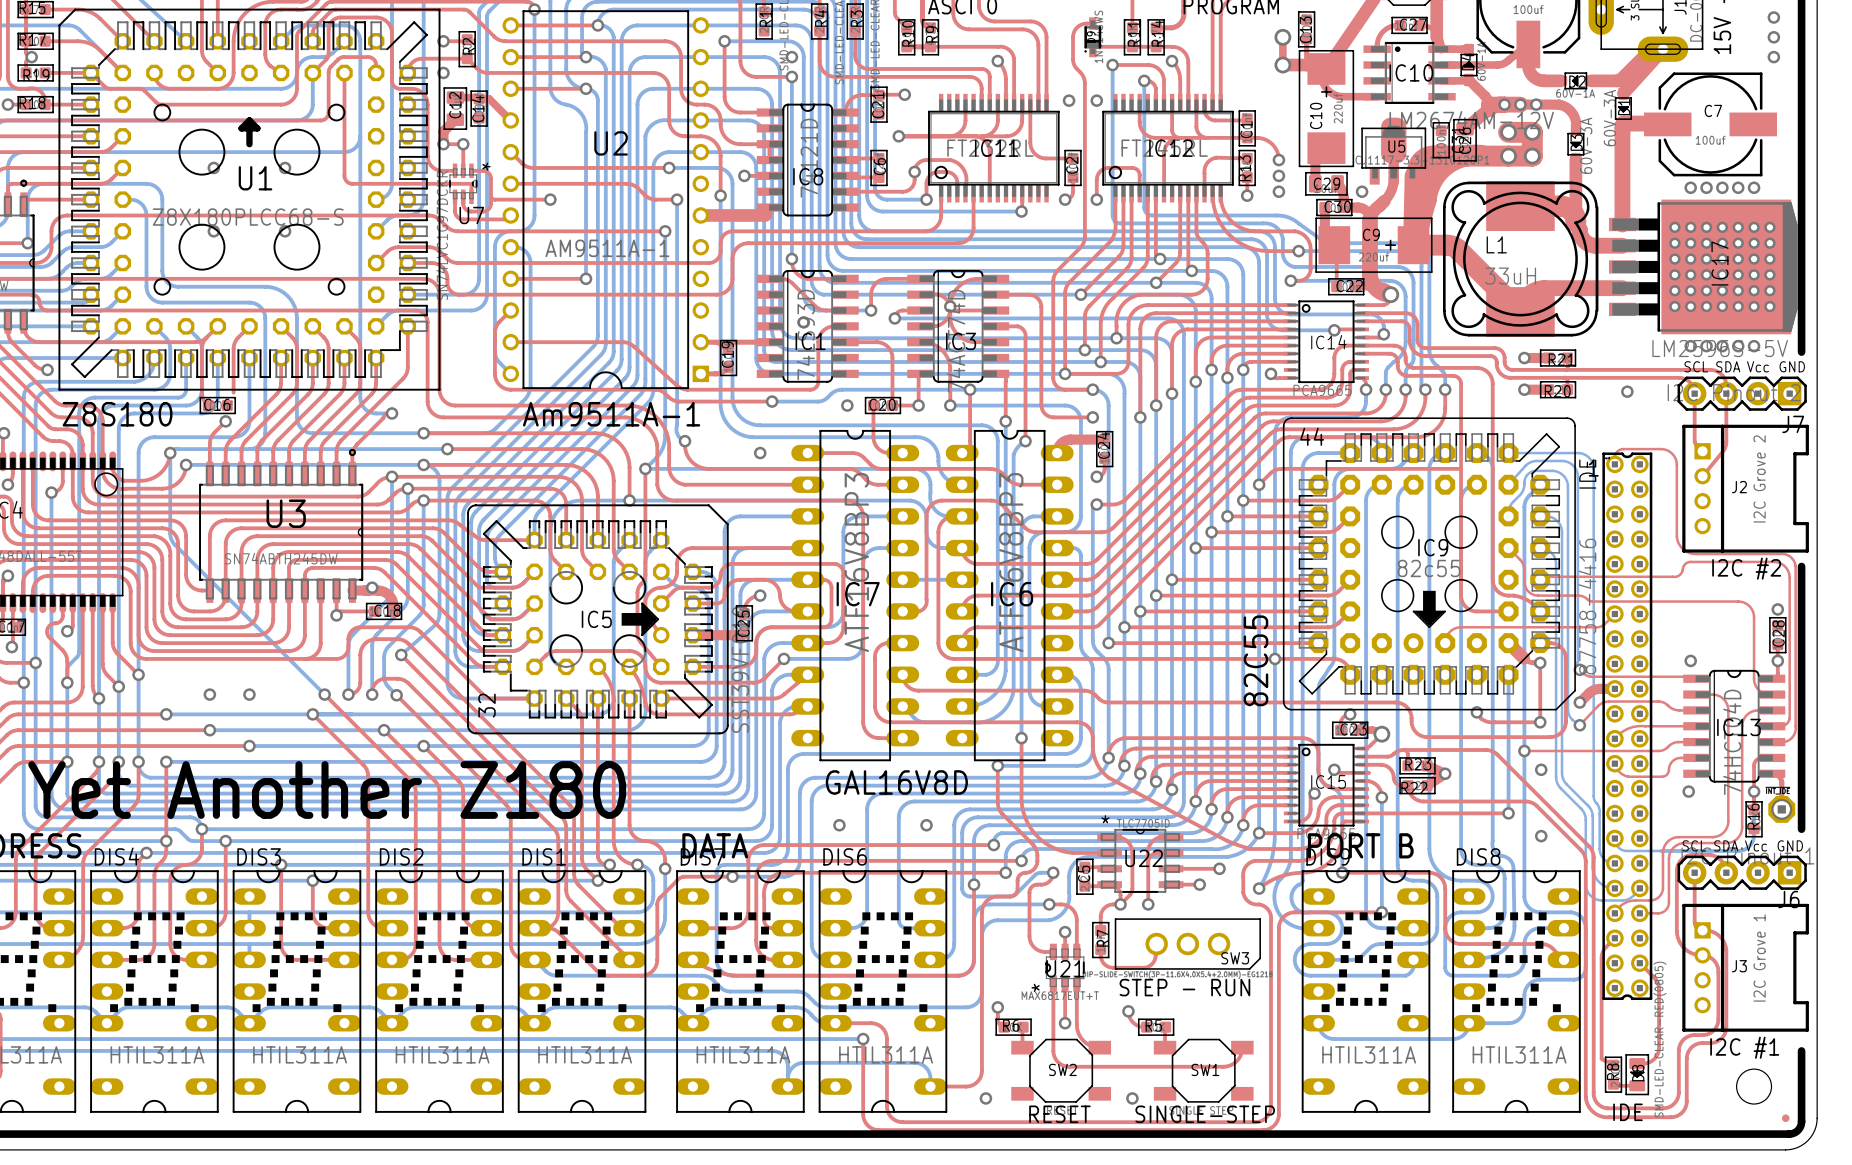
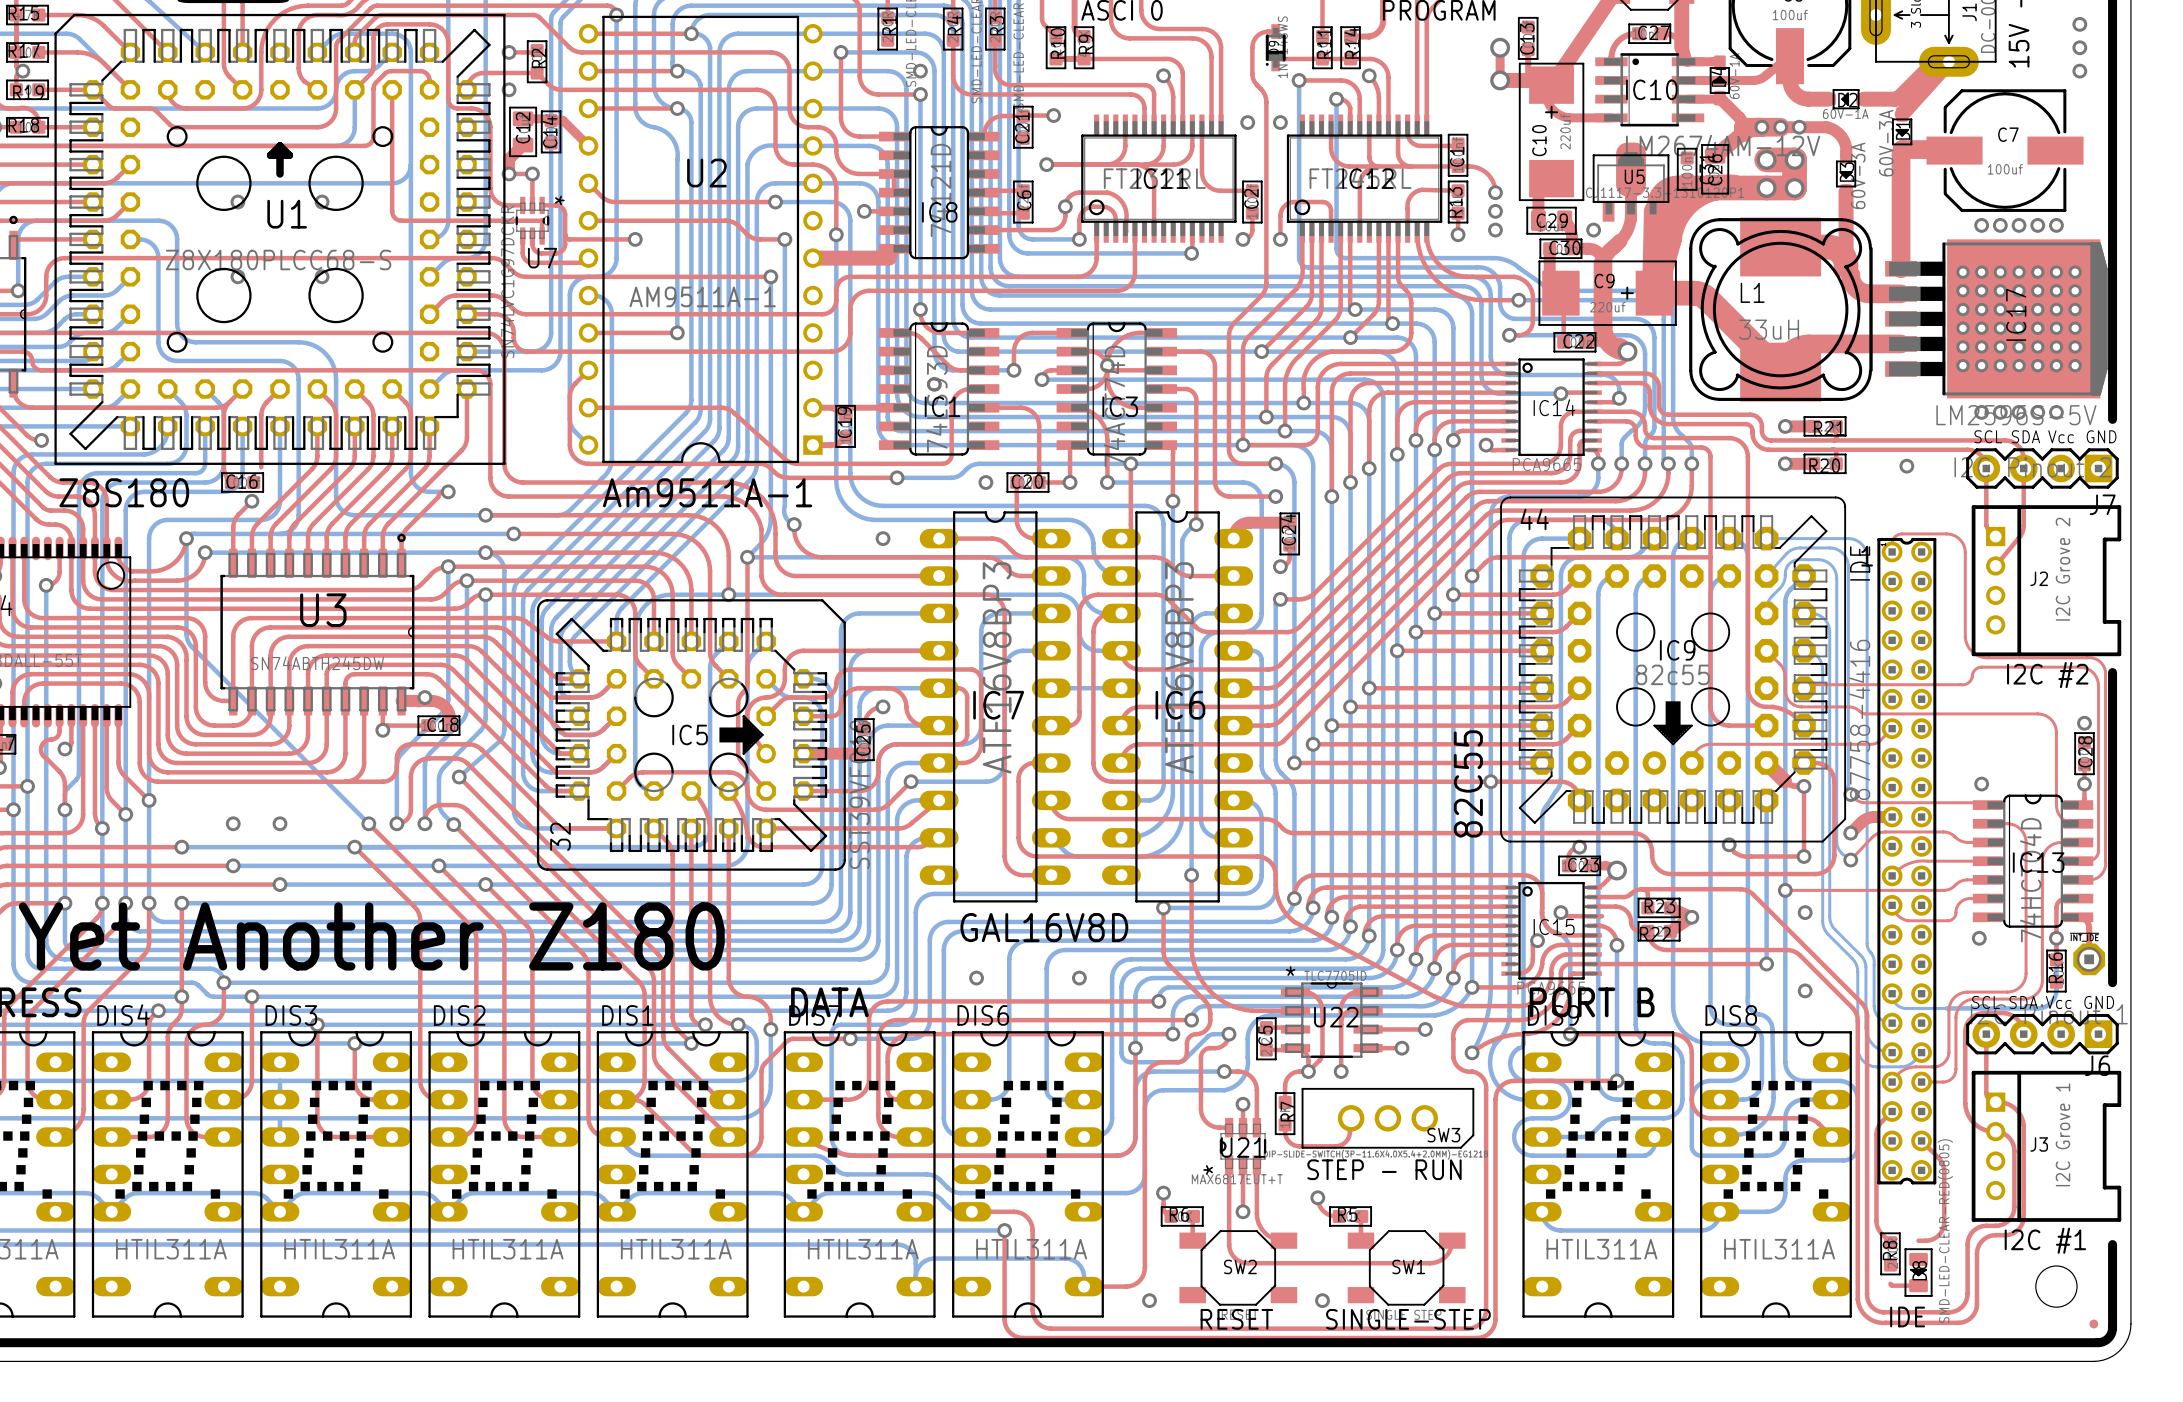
top track: (1601, 1030) (1601, 1058) (1613, 1065) -> (1876, 1220) (1878, 1230) (1890, 1242)
top track: (1659, 1031) (1658, 1049) (1655, 1057) (1647, 1063) (1637, 1063) -> (1944, 1222) (1942, 1229) (1936, 1236) (1930, 1240) (1918, 1240)
R8 position: (1613, 1074) -> (1890, 1253)

